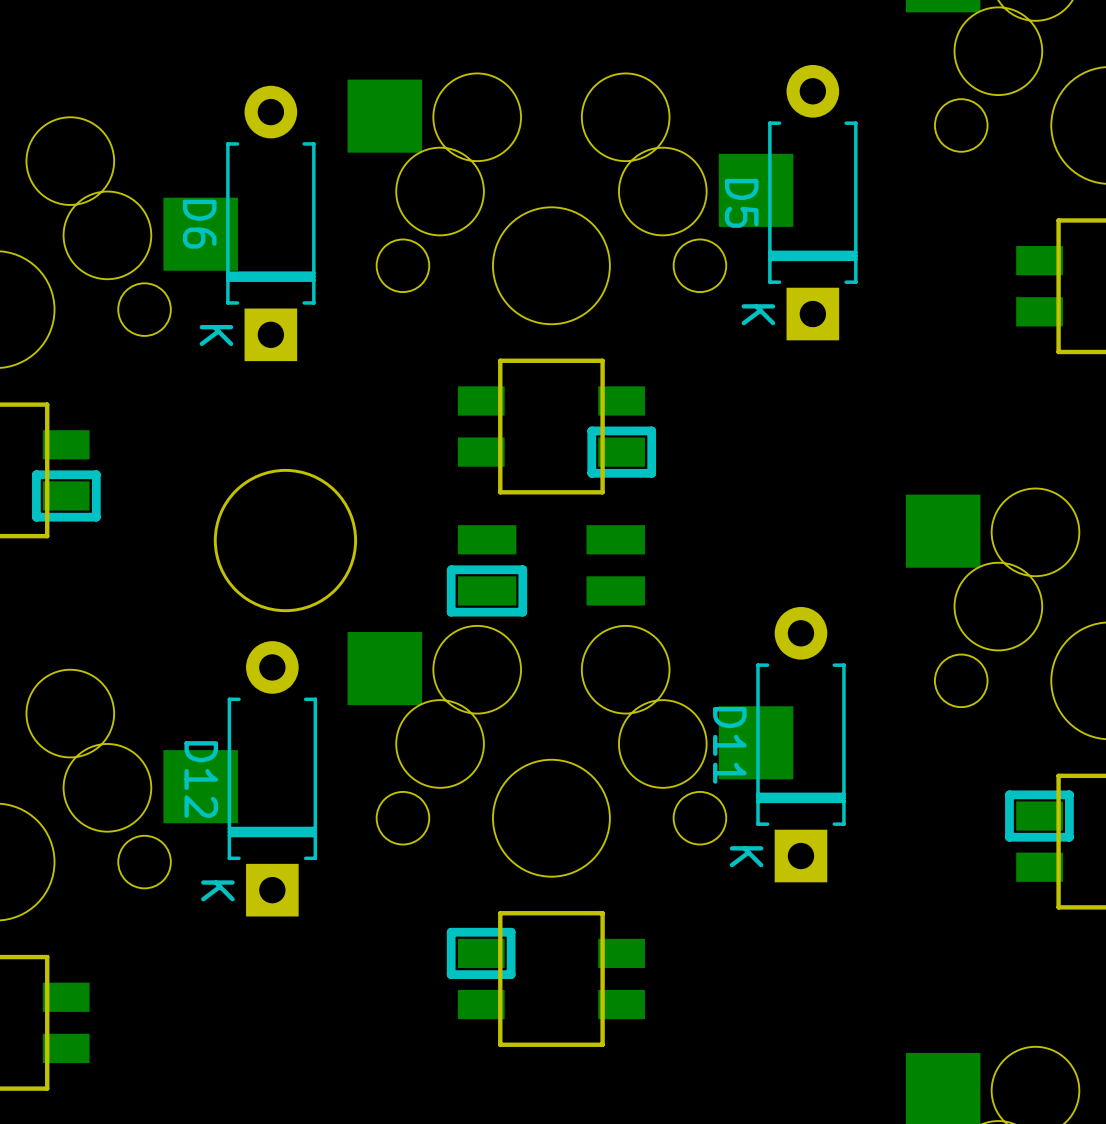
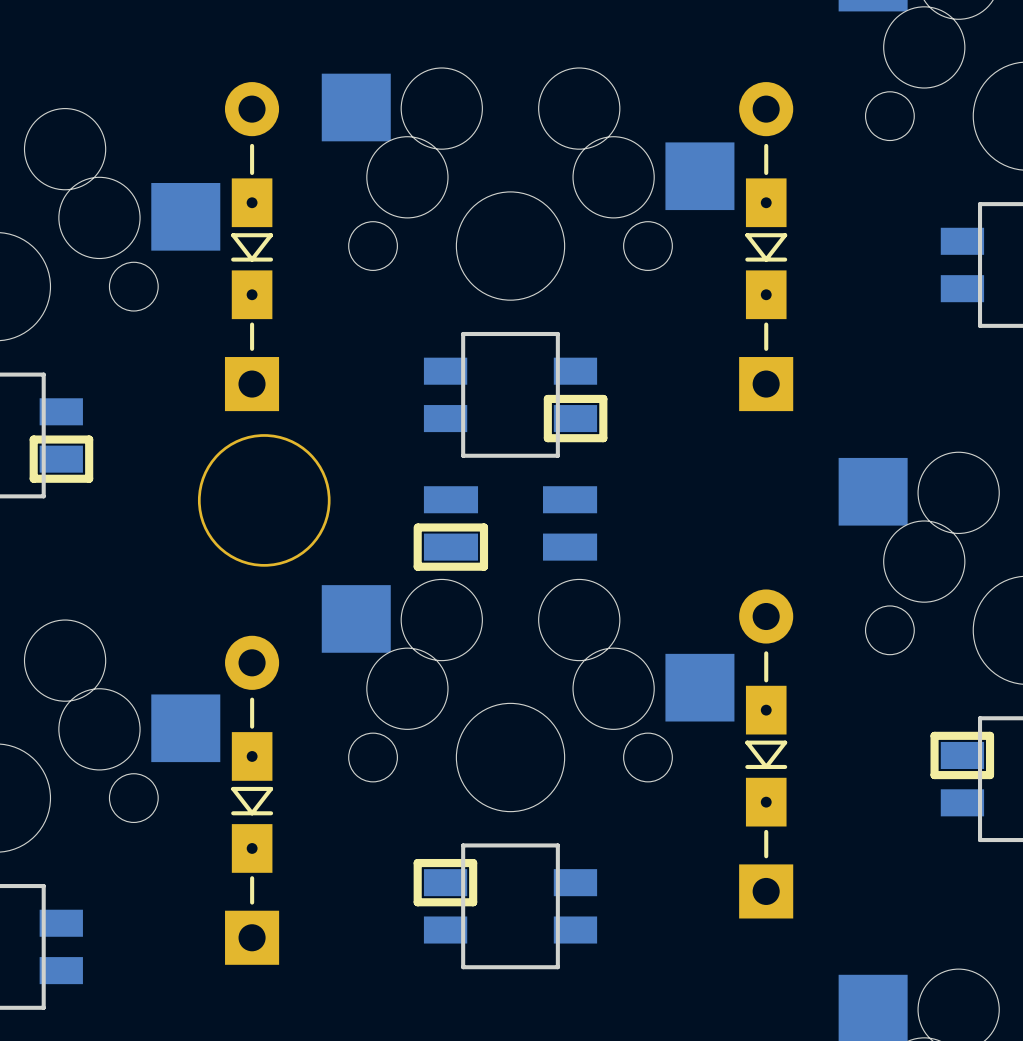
D5: (812, 202) -> none
D6: (270, 223) -> none
part: none -> (252, 246)
part: none -> (766, 246)
D11: (800, 744) -> none
D12: (272, 778) -> none
part: none -> (766, 753)
part: none -> (252, 800)

